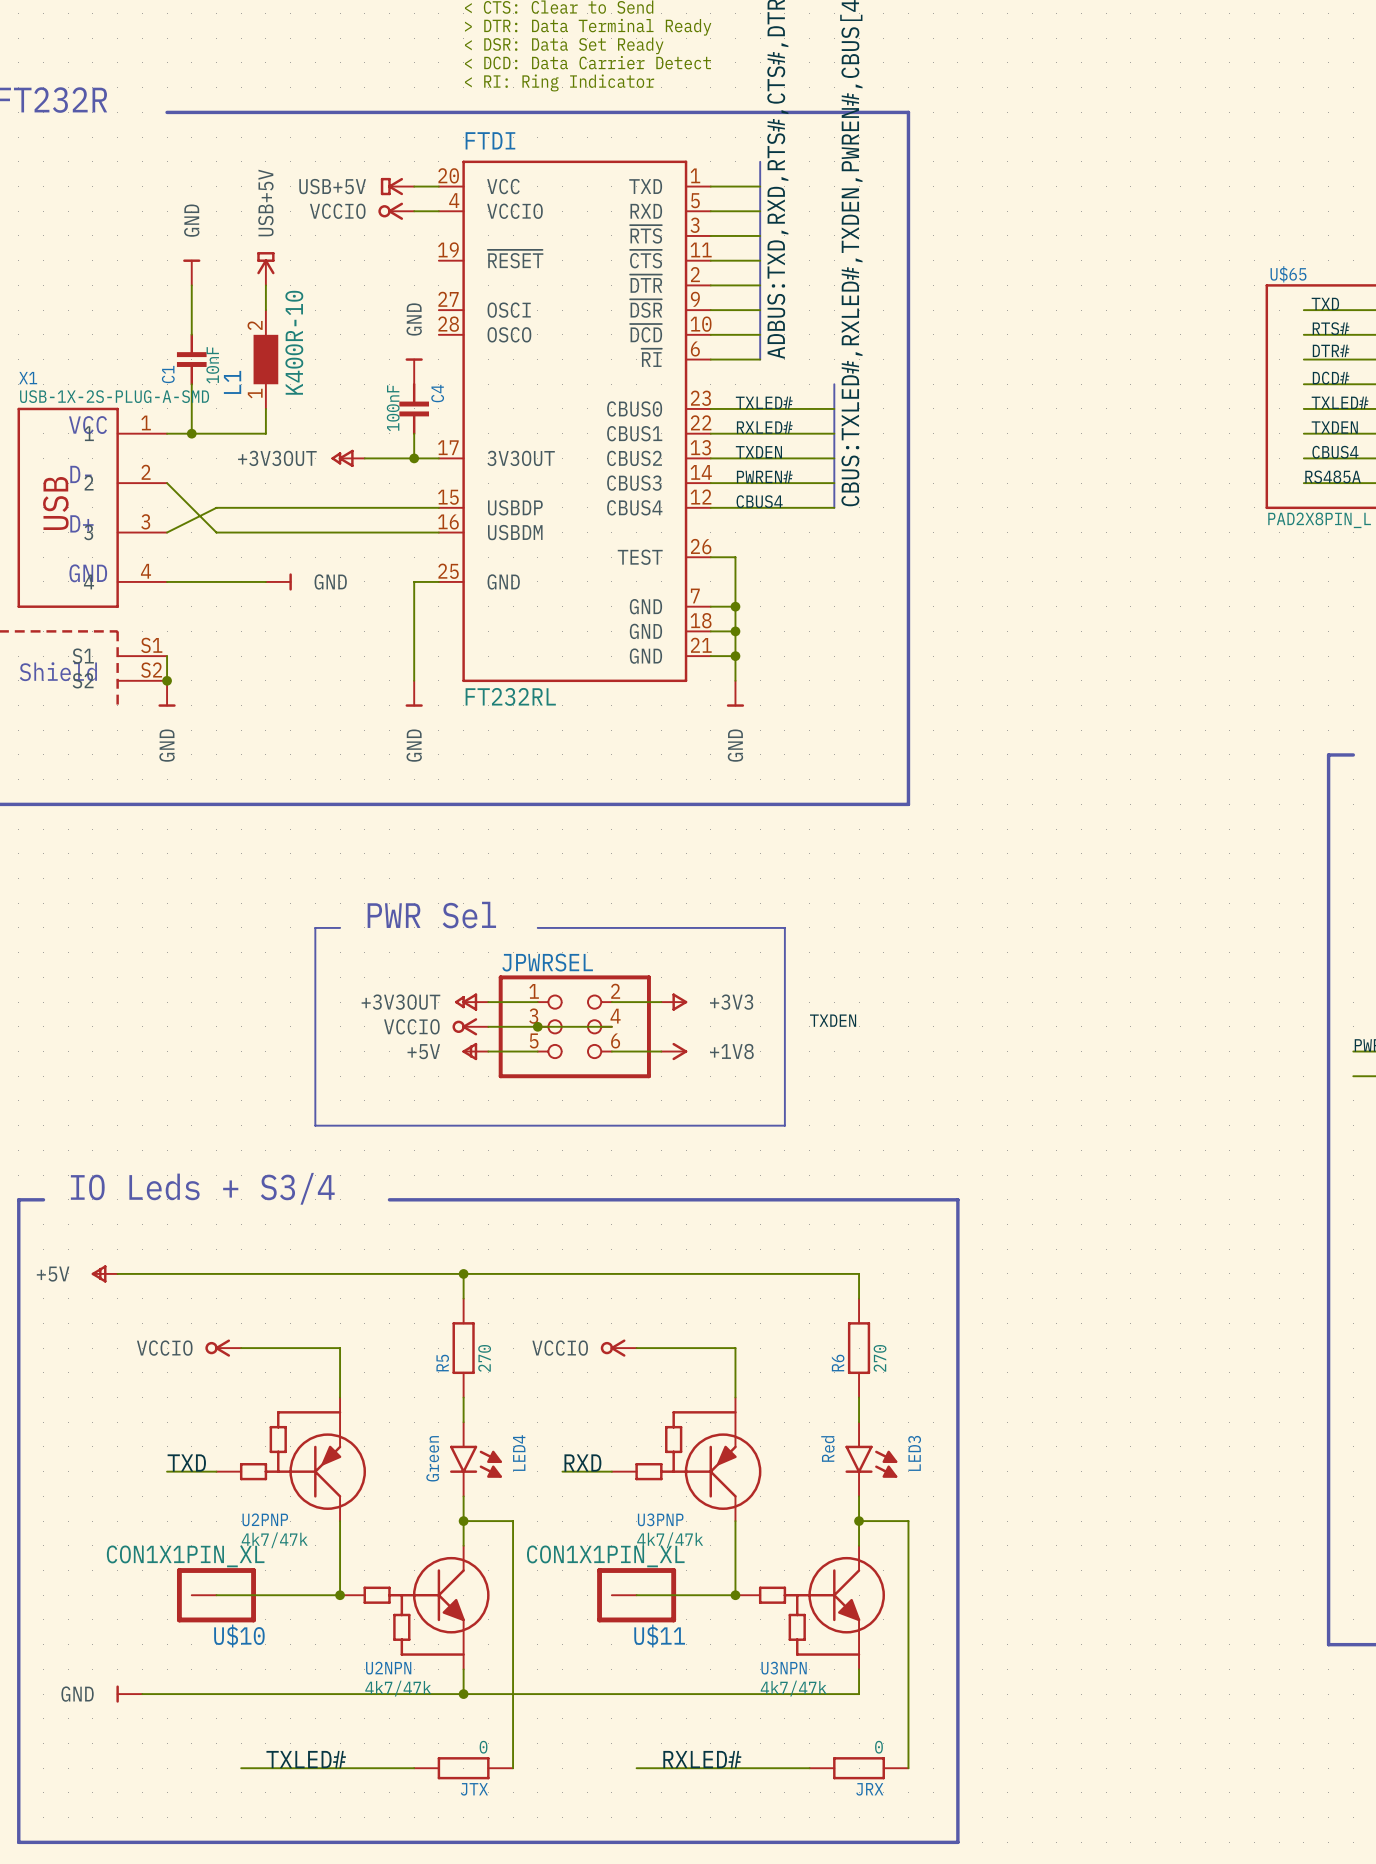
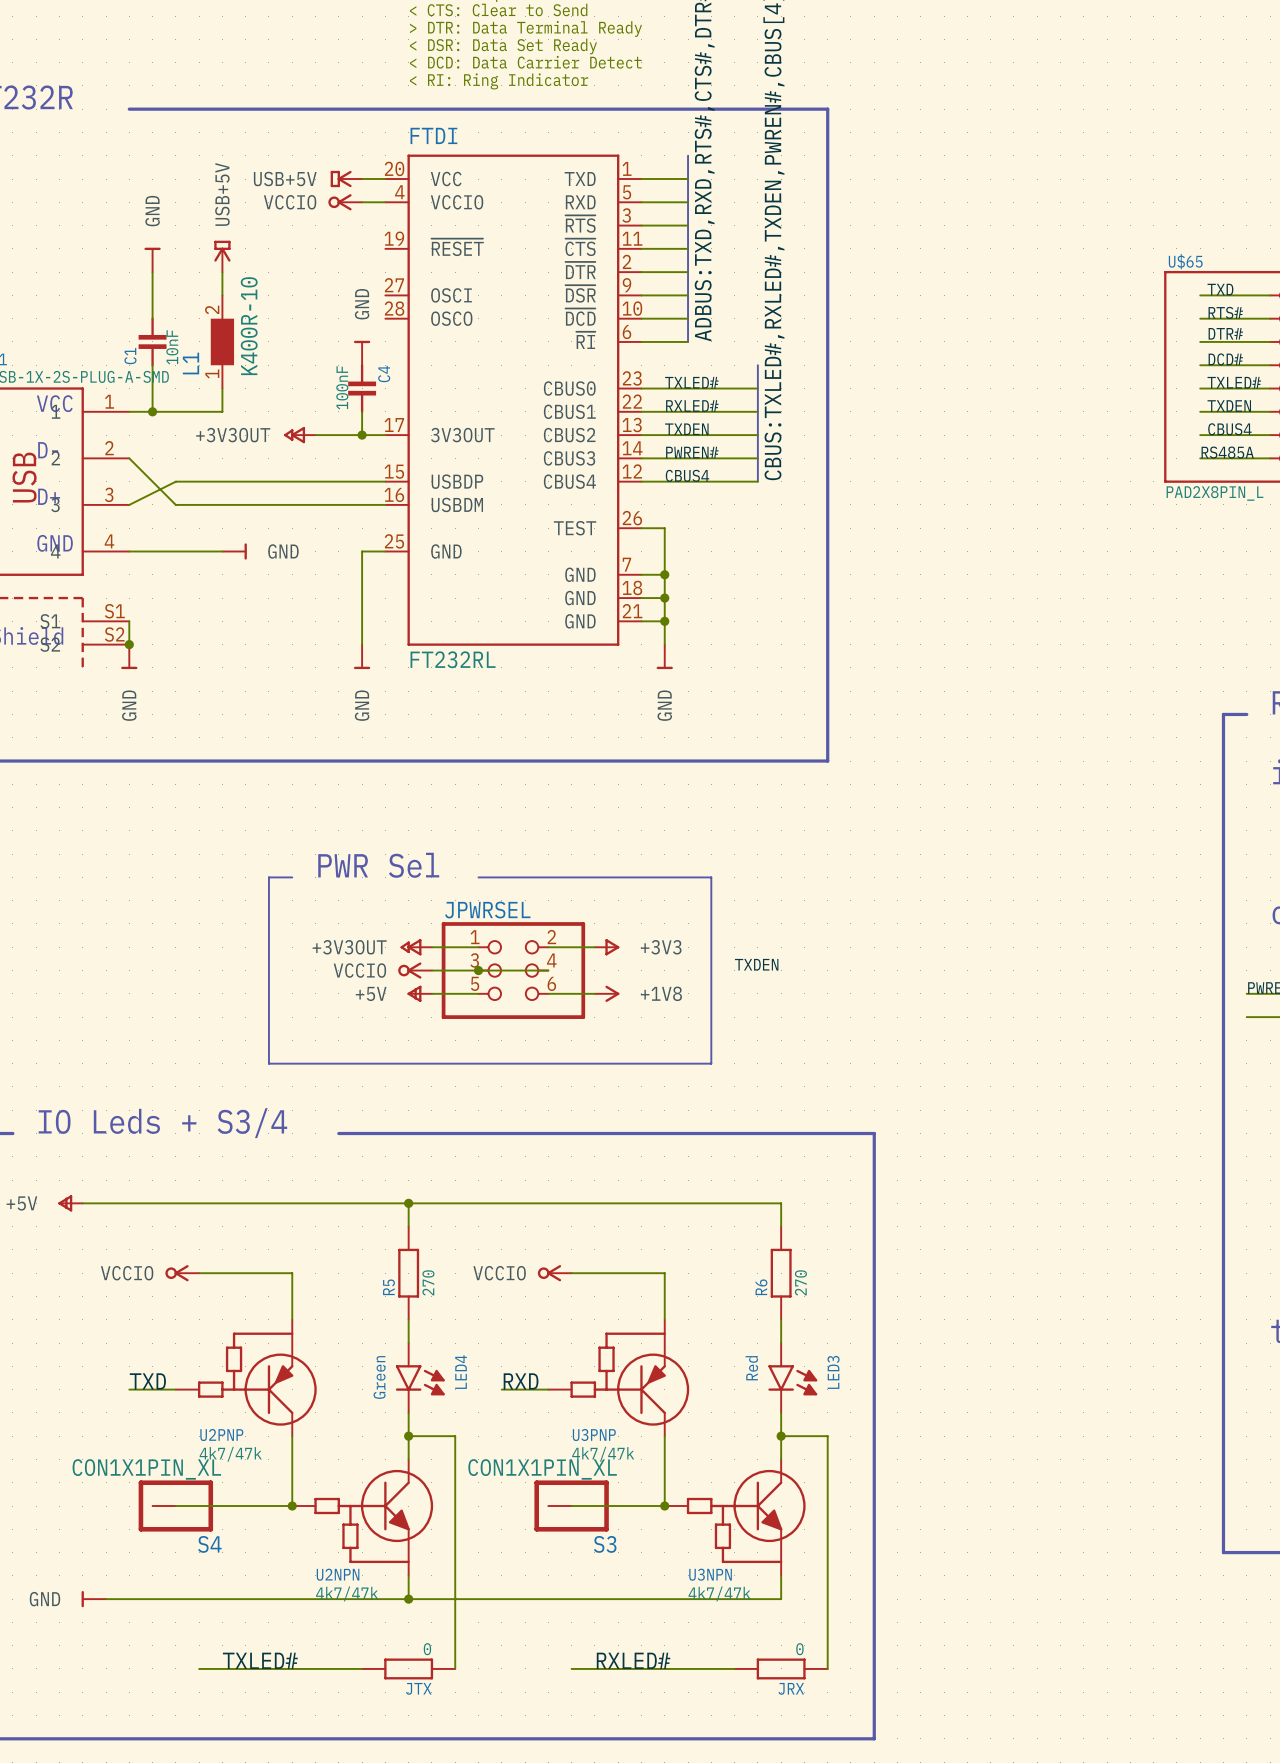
U$10 name: U$10 (239, 1636) -> S4 (209, 1544)
U$11 name: U$11 (659, 1636) -> S3 (605, 1544)

